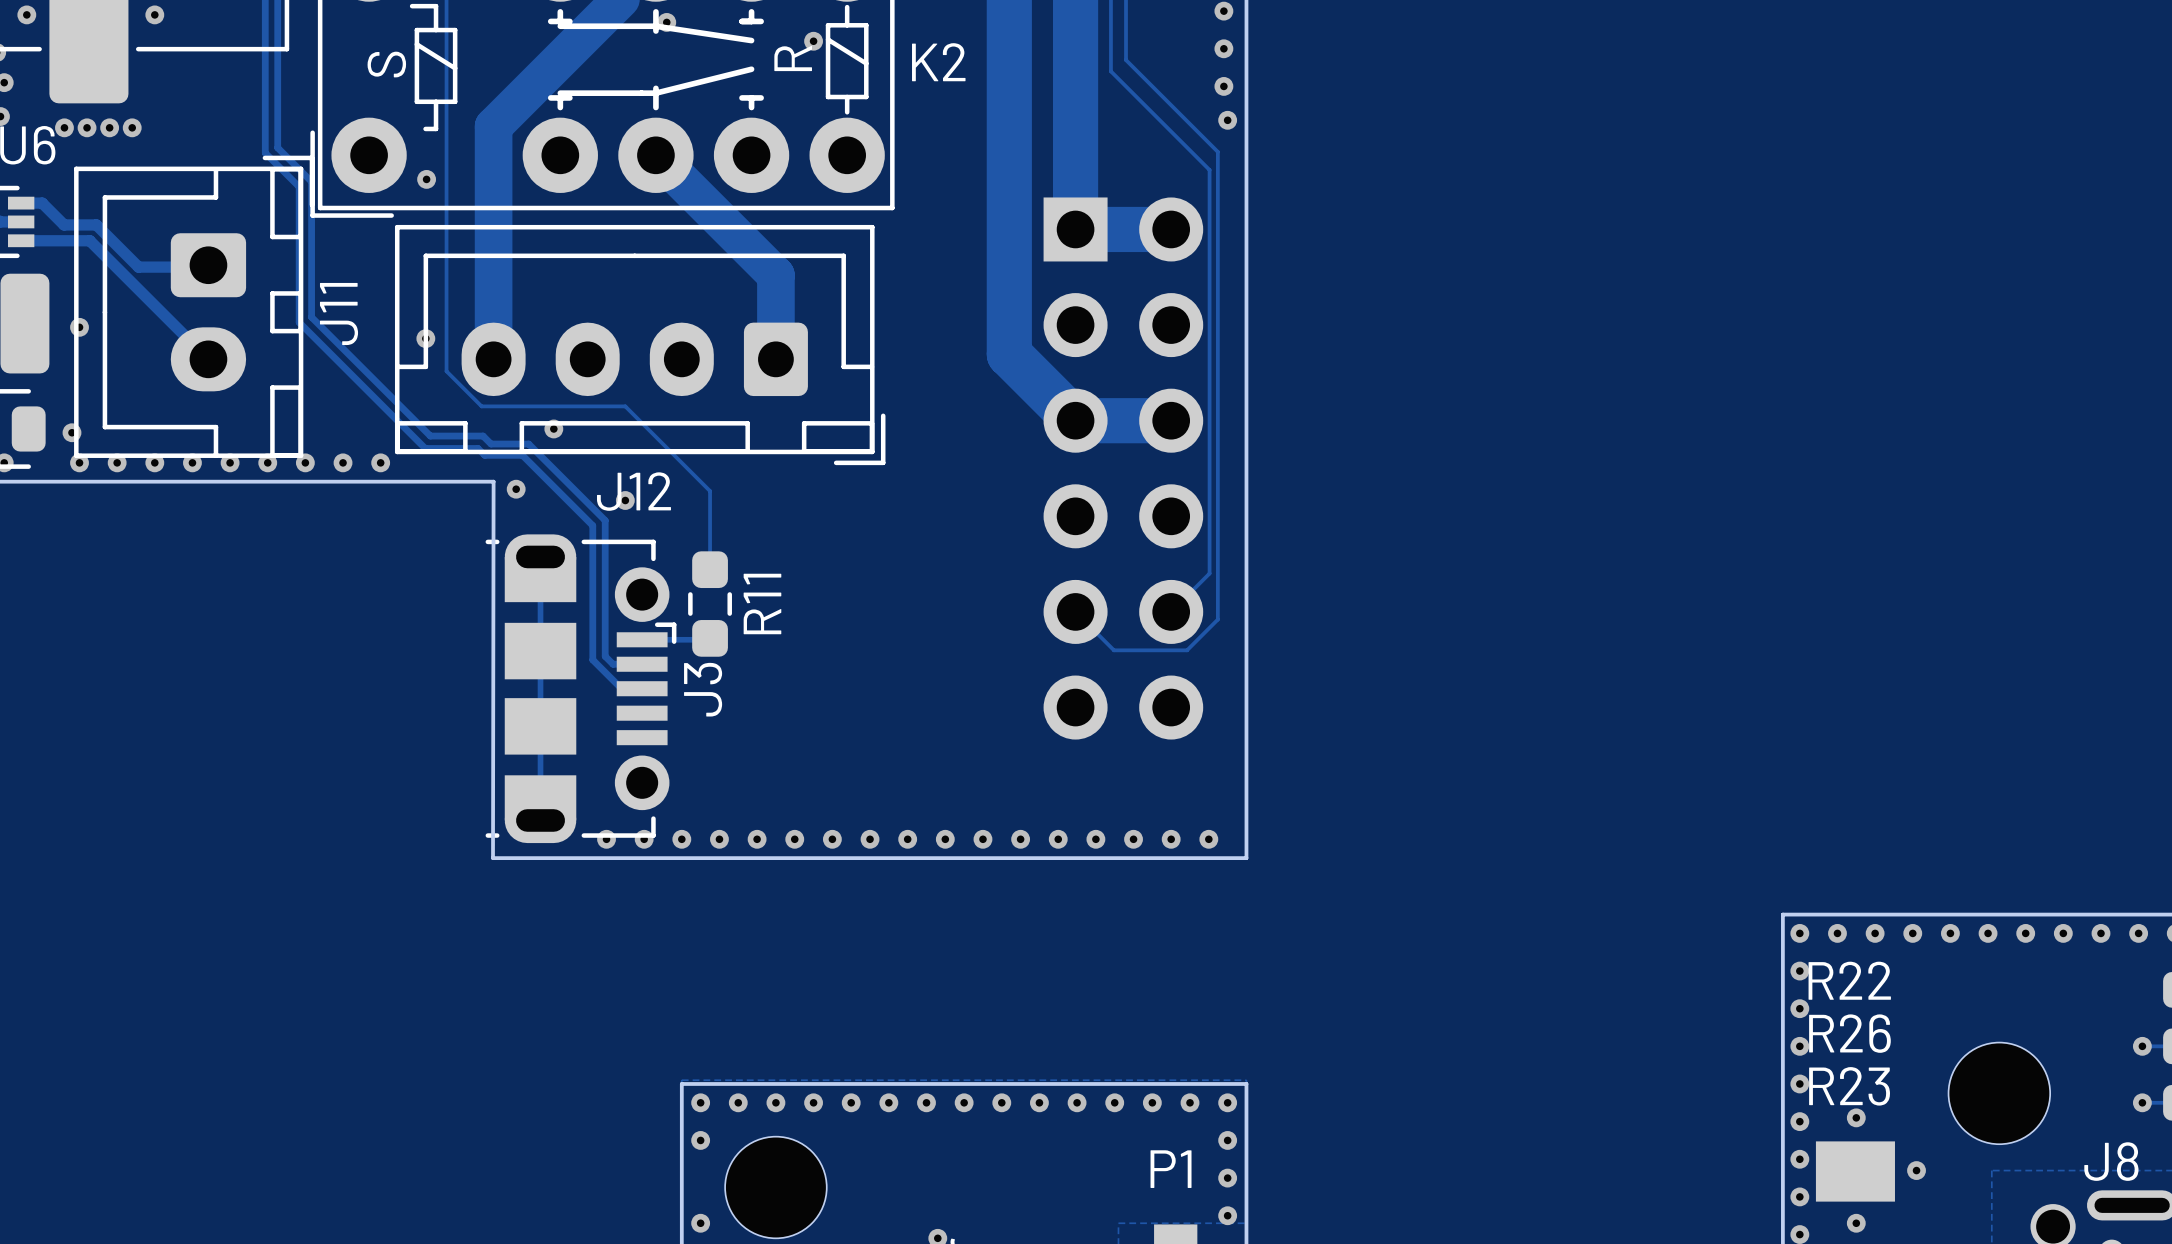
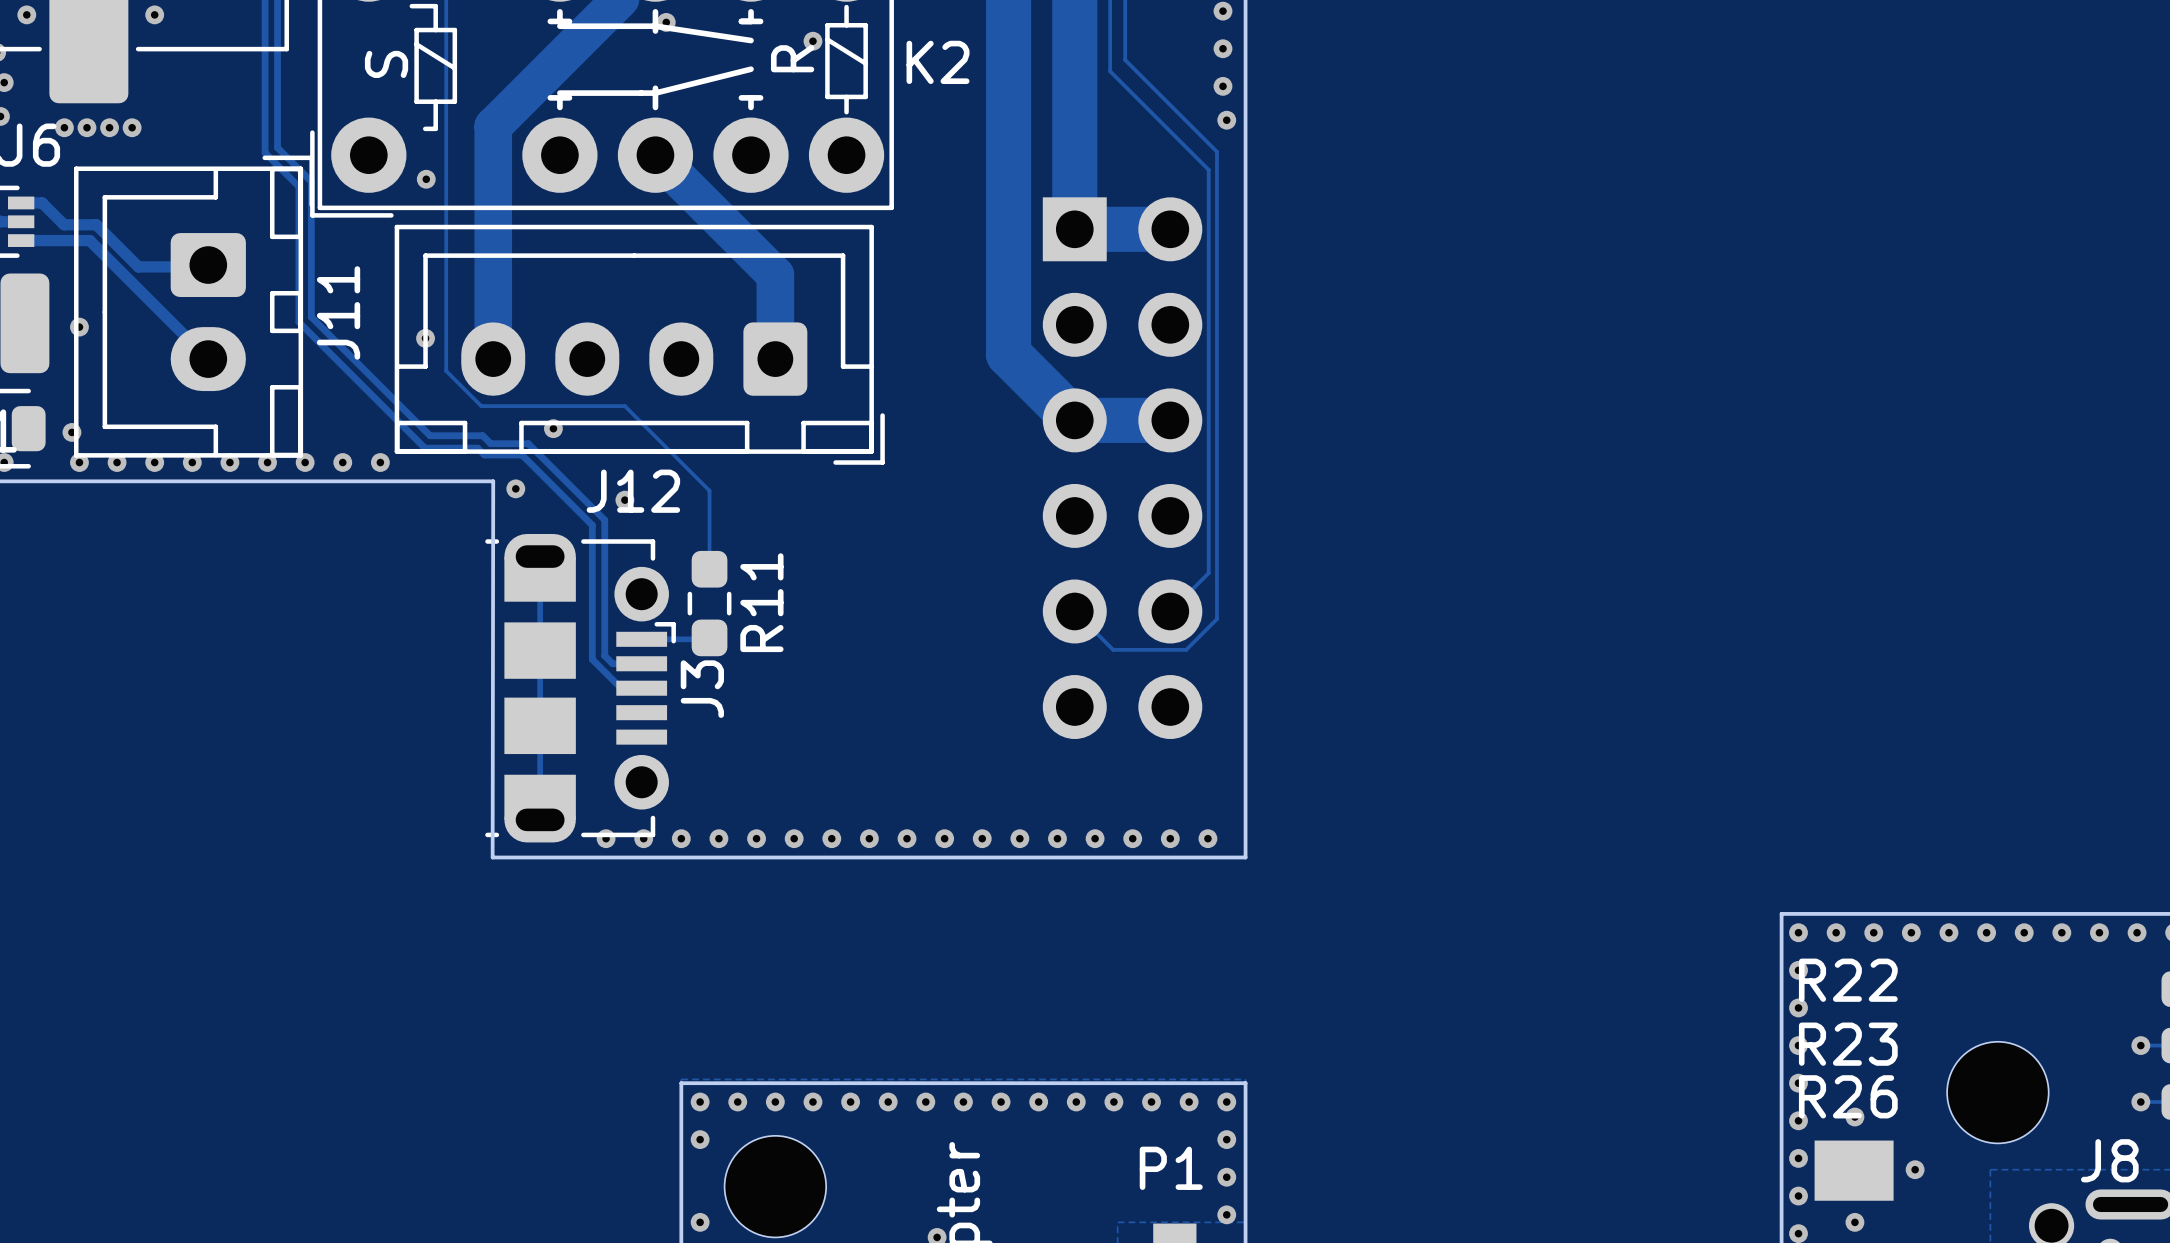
R26 name position: R26 (1849, 1033) -> R26 (1848, 1096)
R23 name position: R23 (1849, 1086) -> R23 (1848, 1044)

